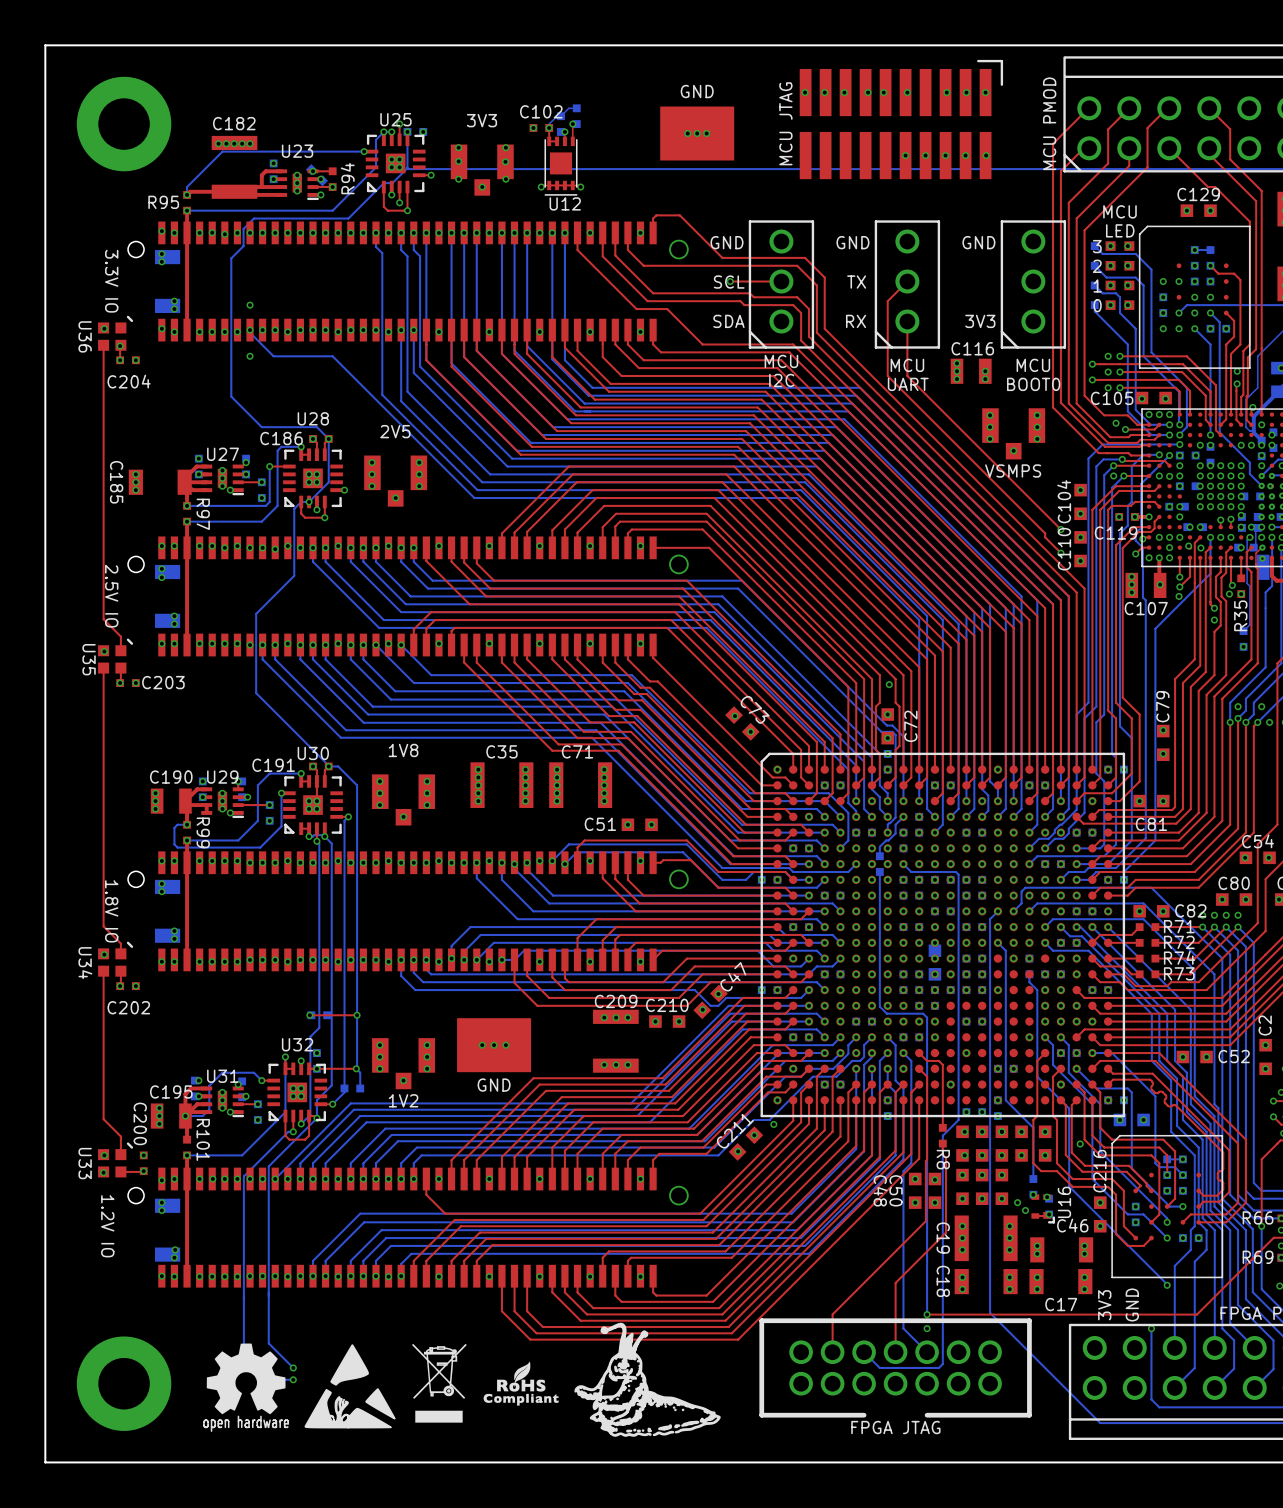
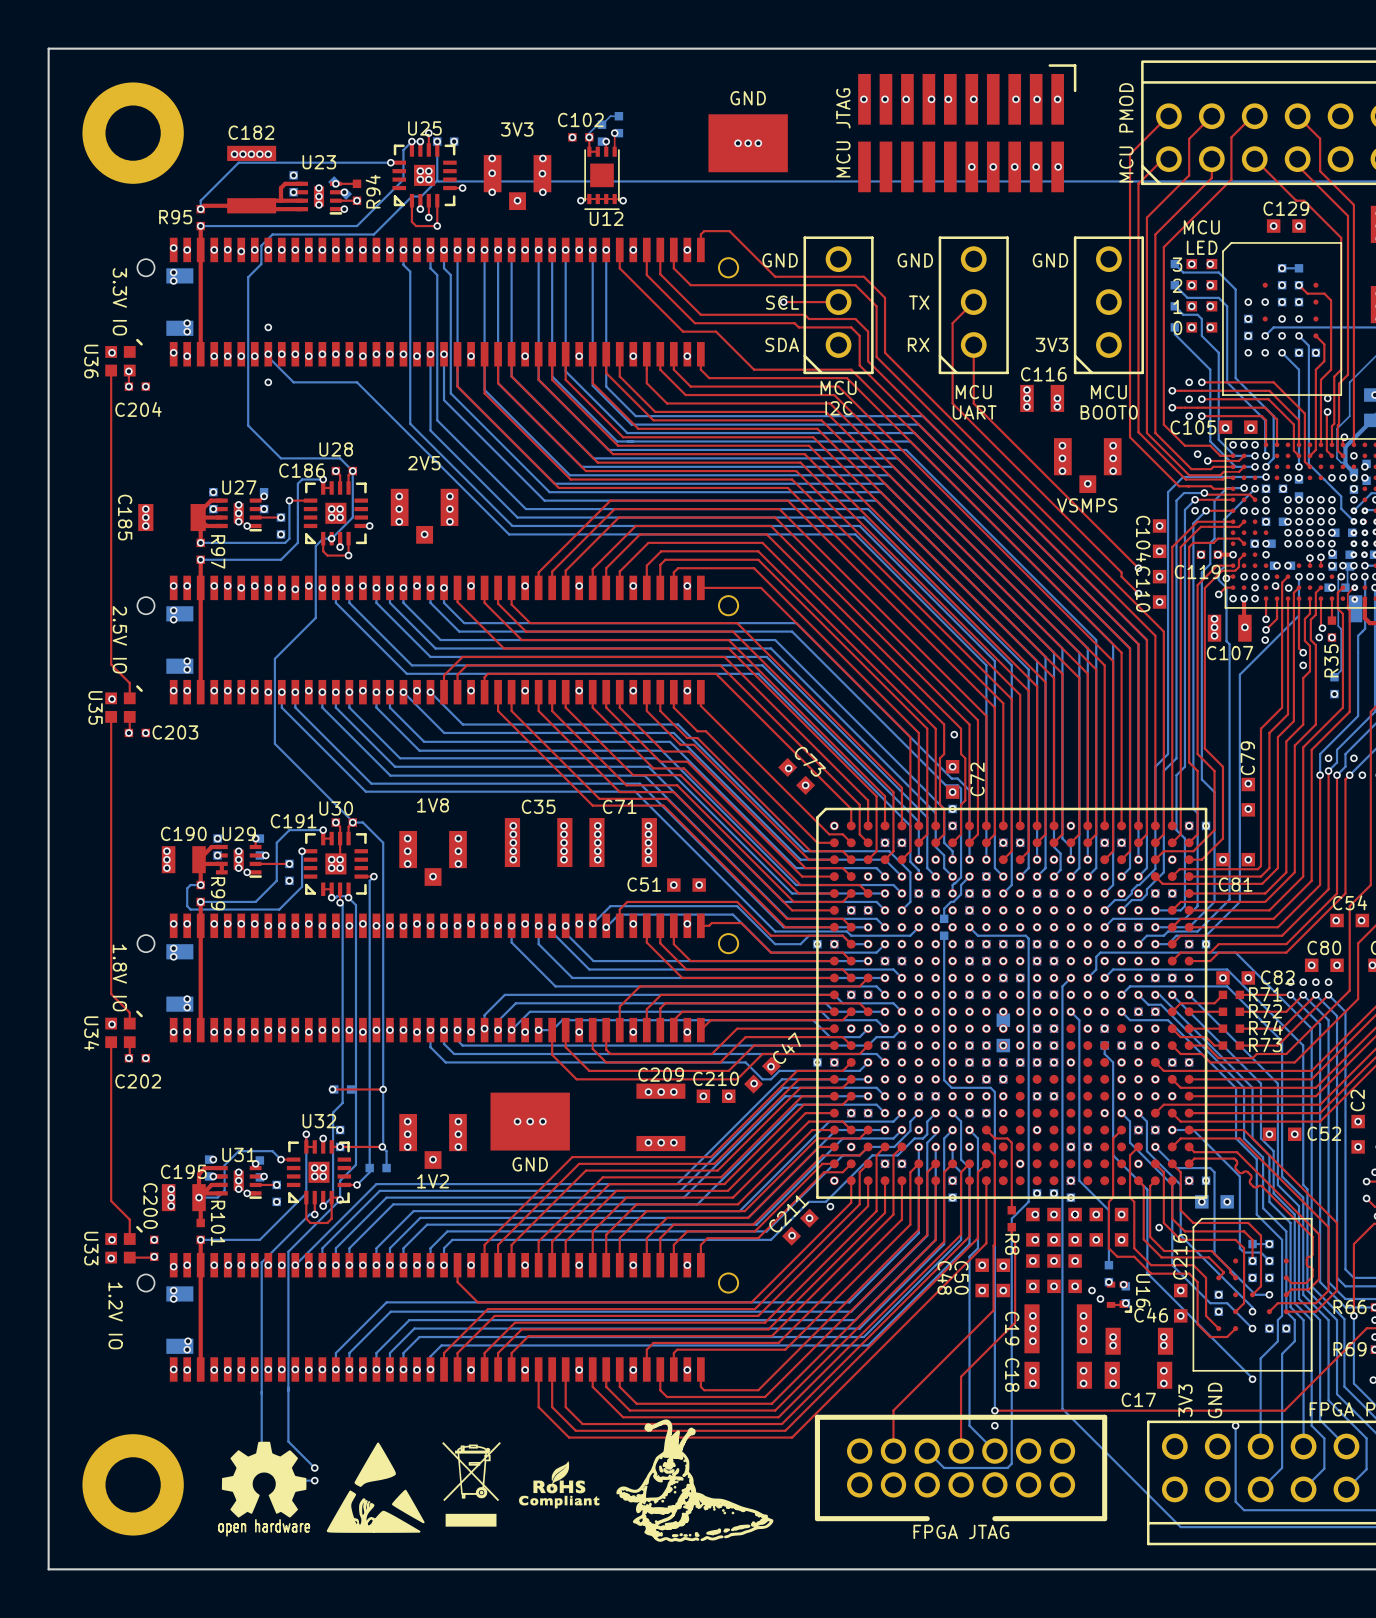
C104 name rotation: 0° (1064, 501) -> 180° (1143, 538)
C110 name rotation: 0° (1064, 549) -> 180° (1143, 589)
U16 name rotation: 0° (1064, 1202) -> 180° (1143, 1290)

